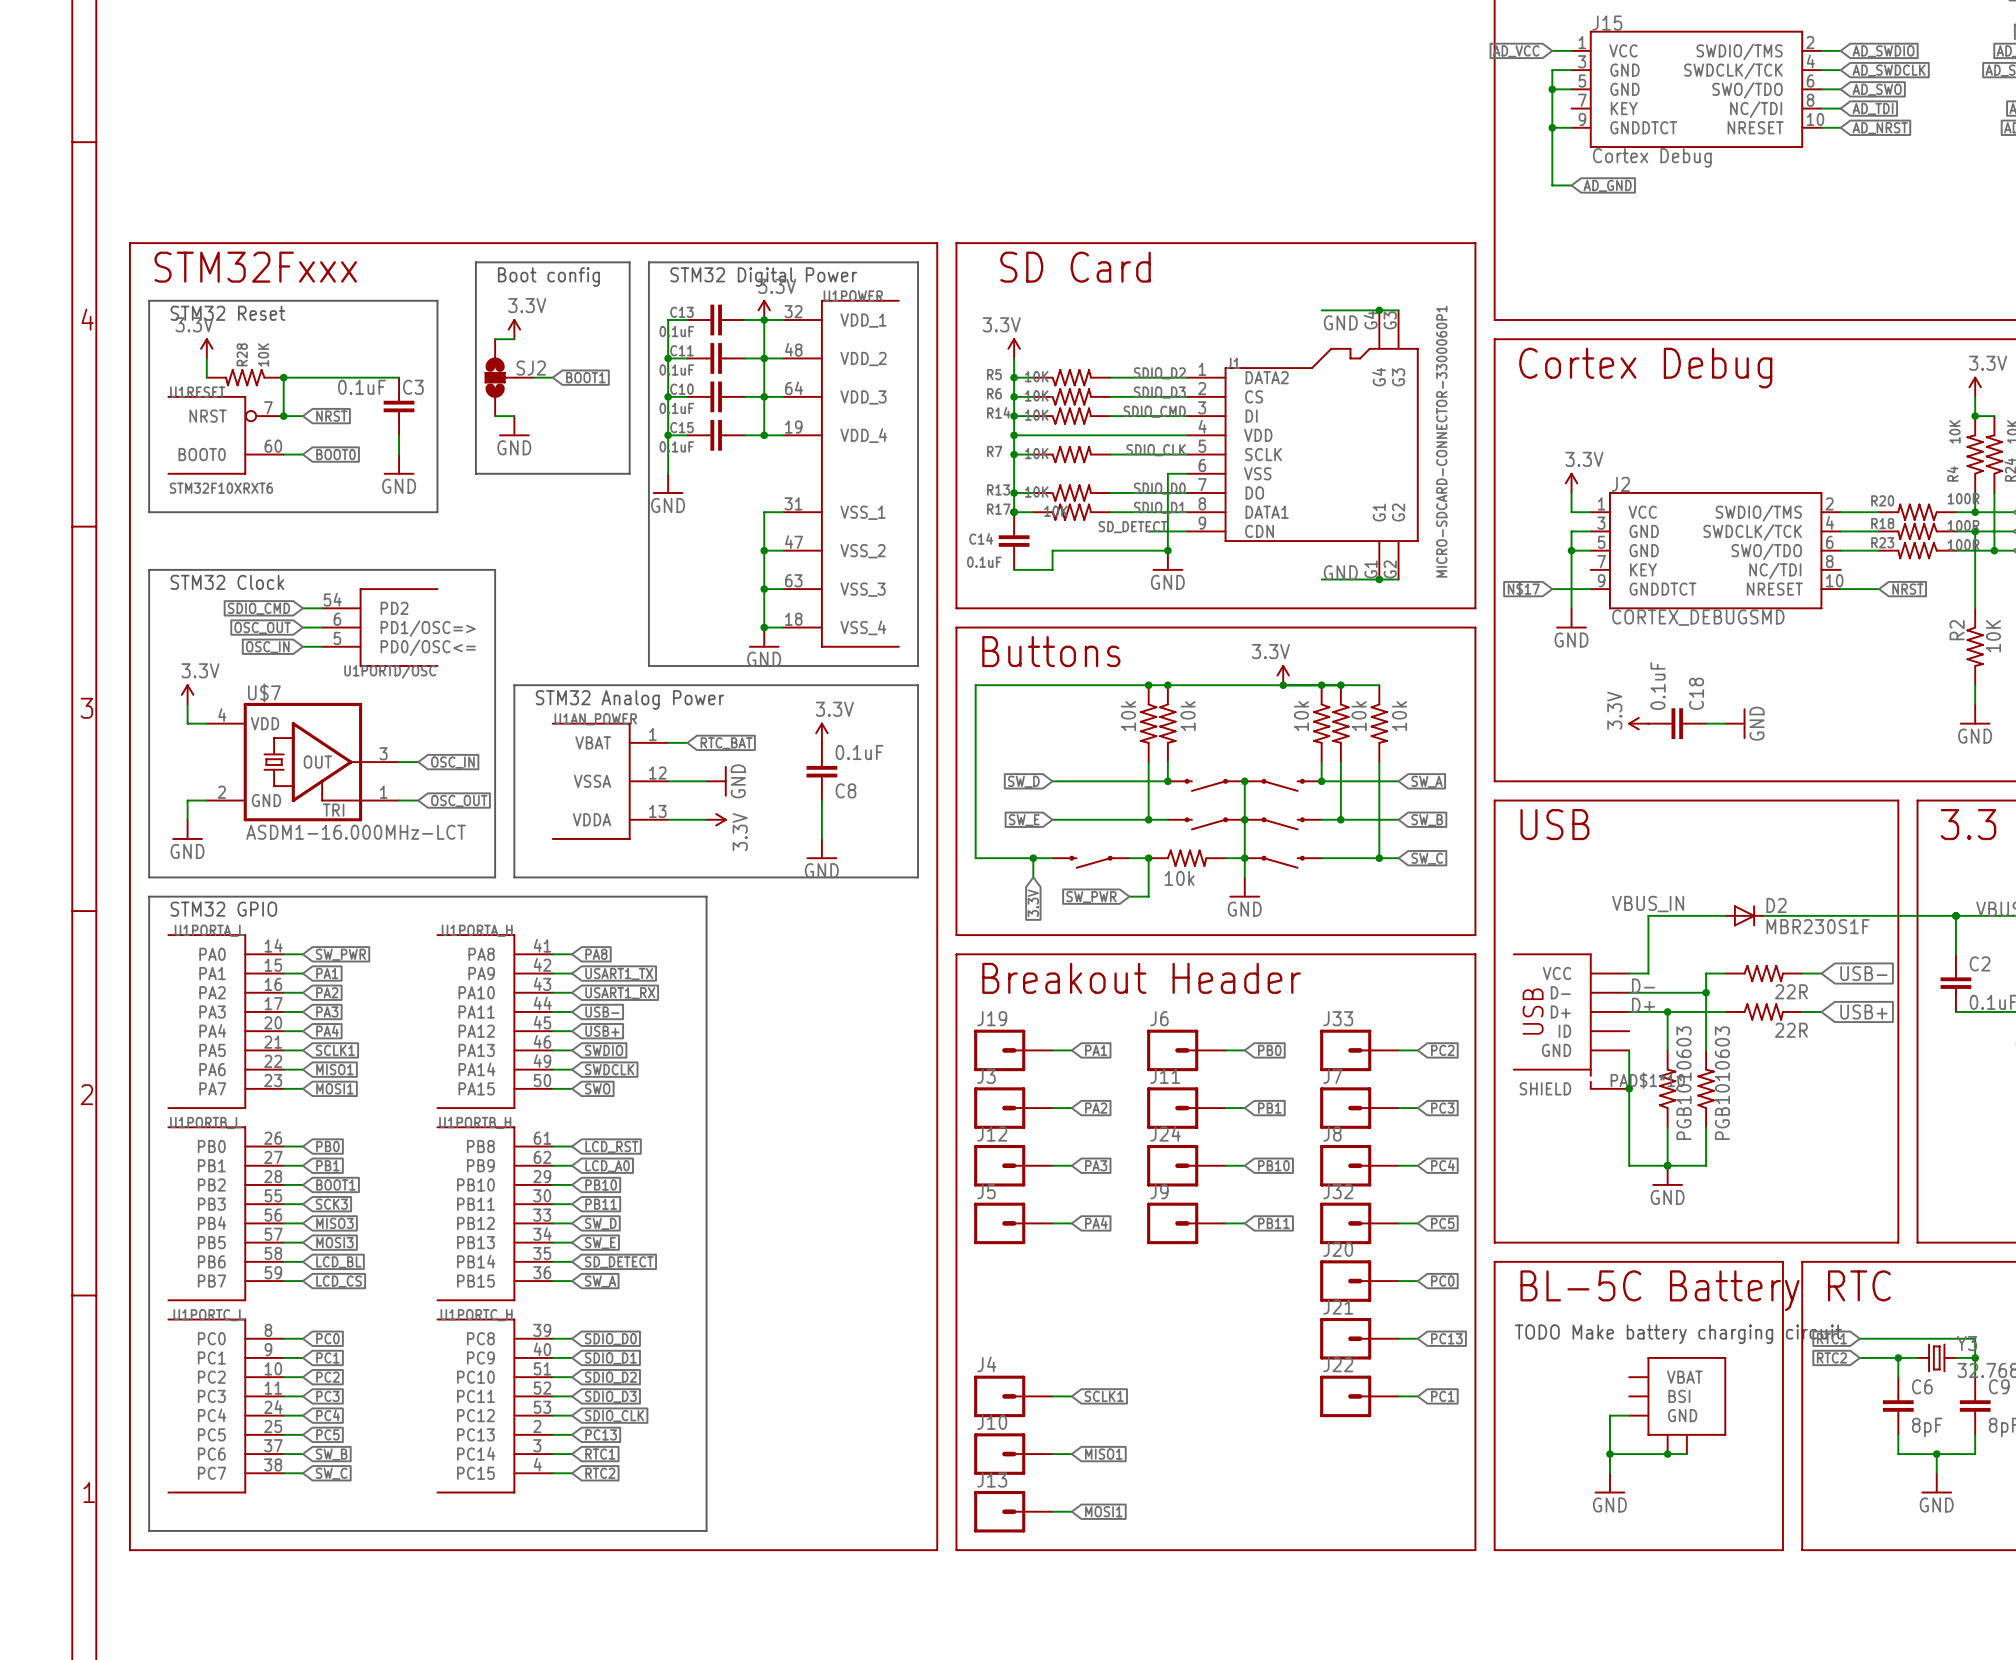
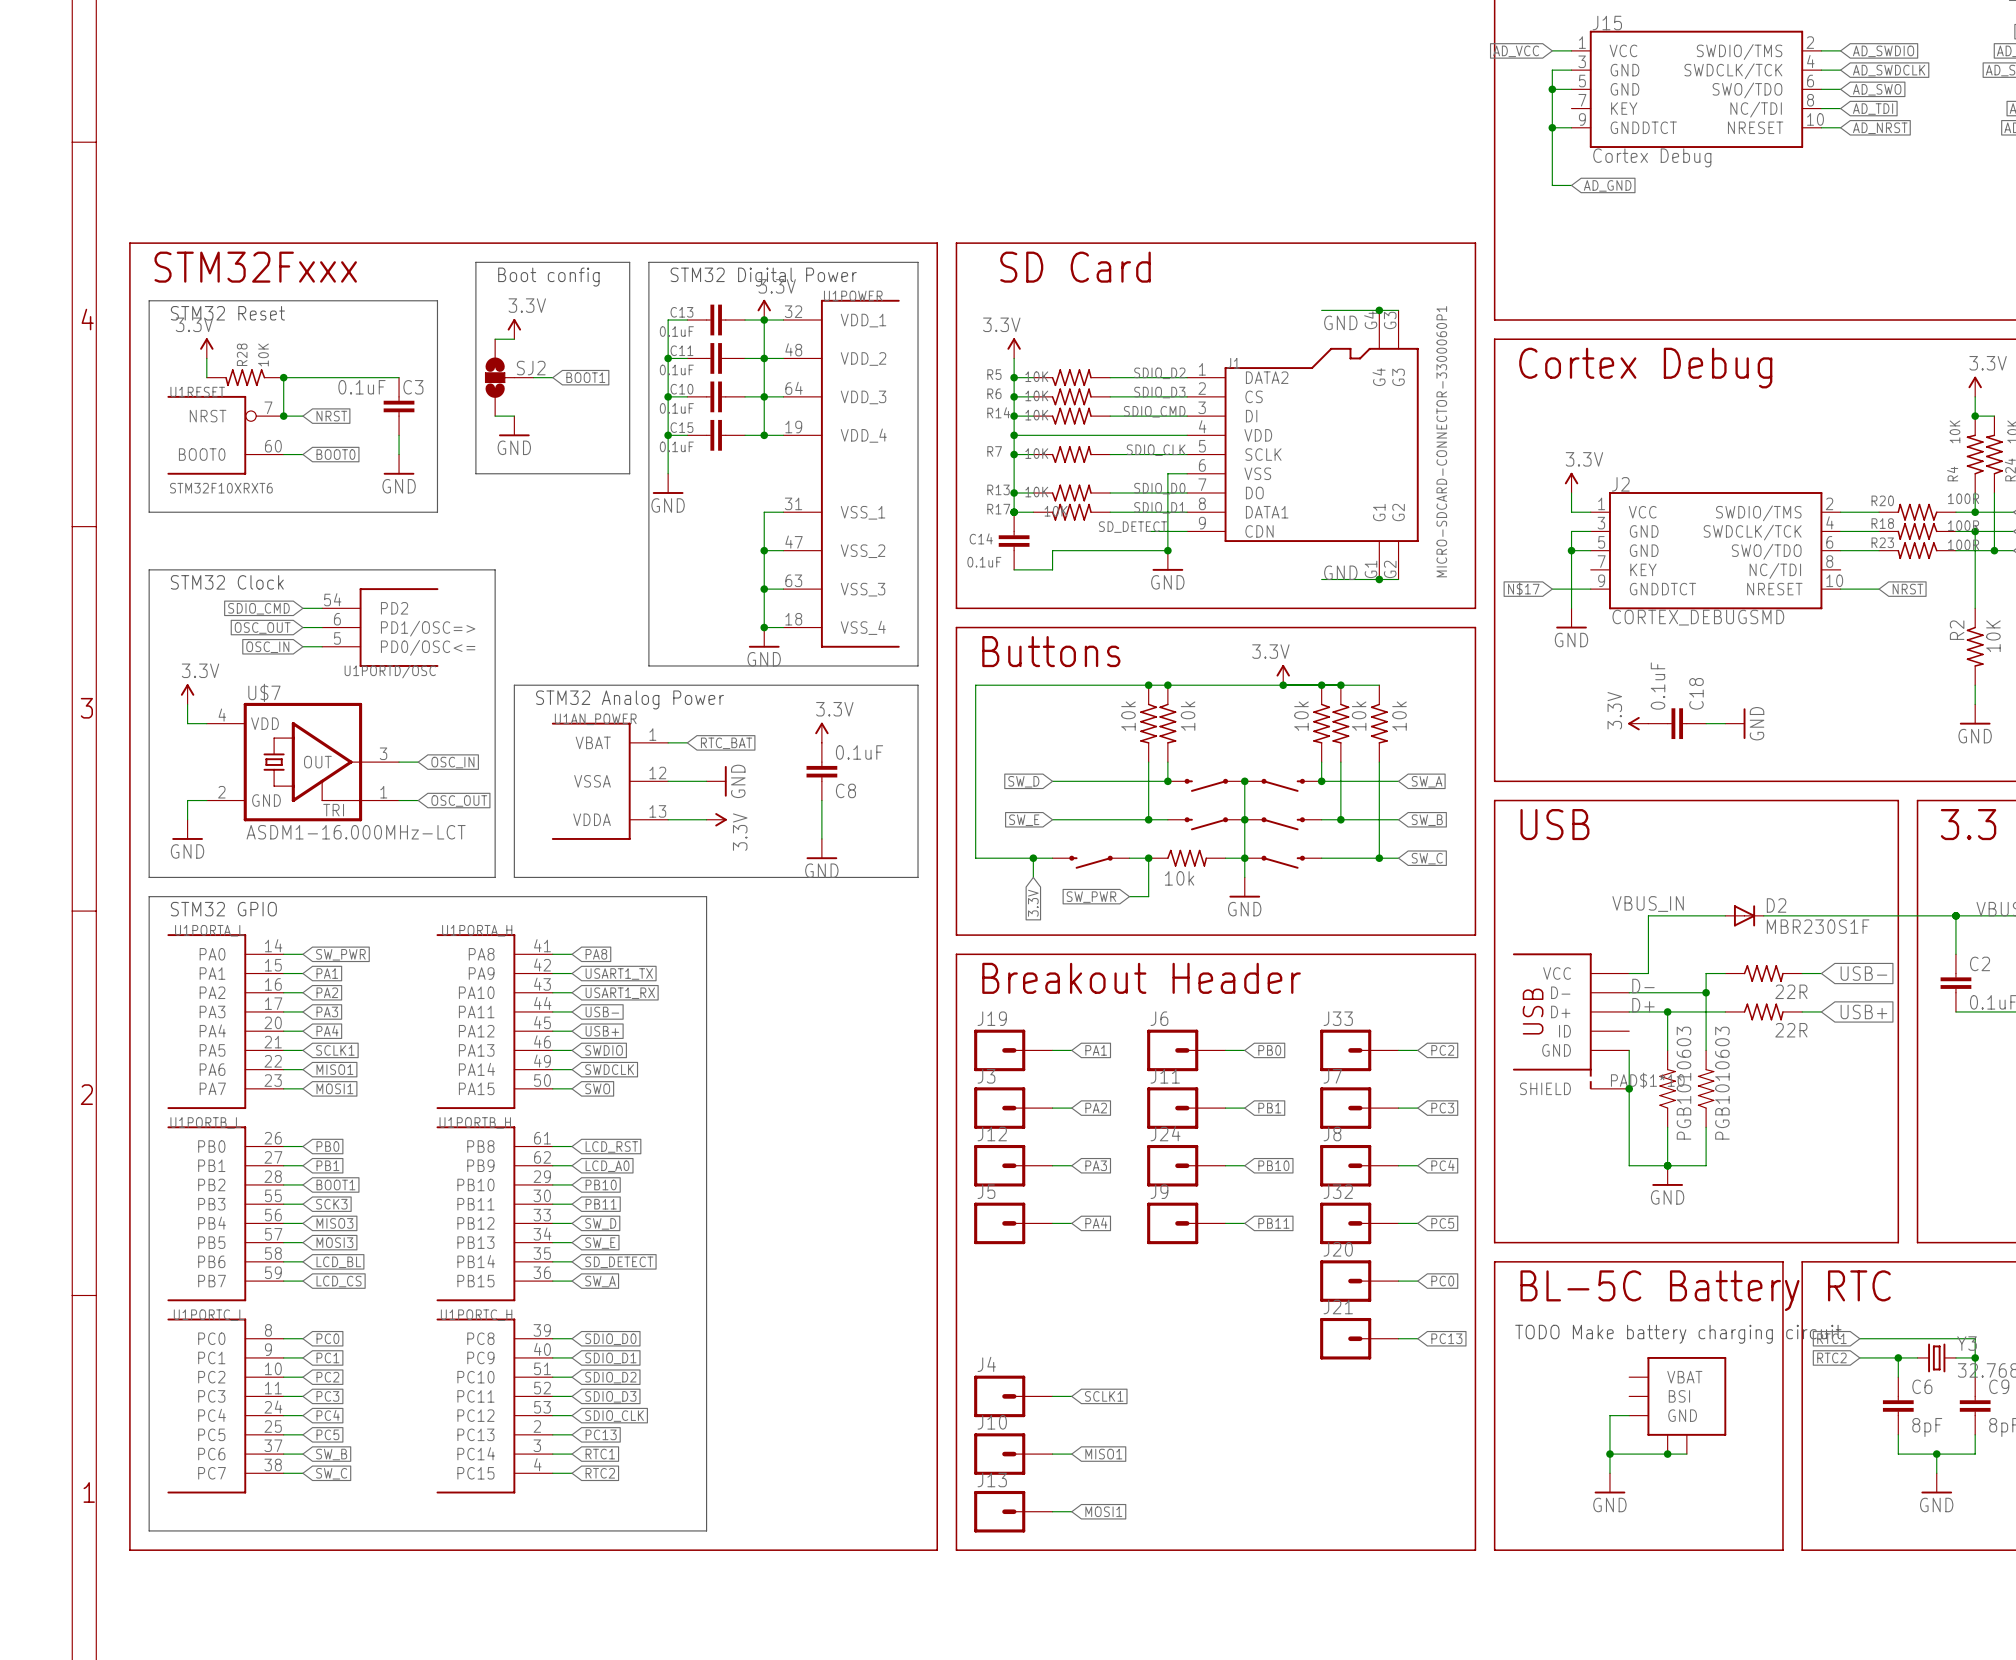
J22: (1359, 1396) -> none
wire: (1398, 1396) (1417, 1396) -> none
global label: PC1 (1442, 1396) -> none

